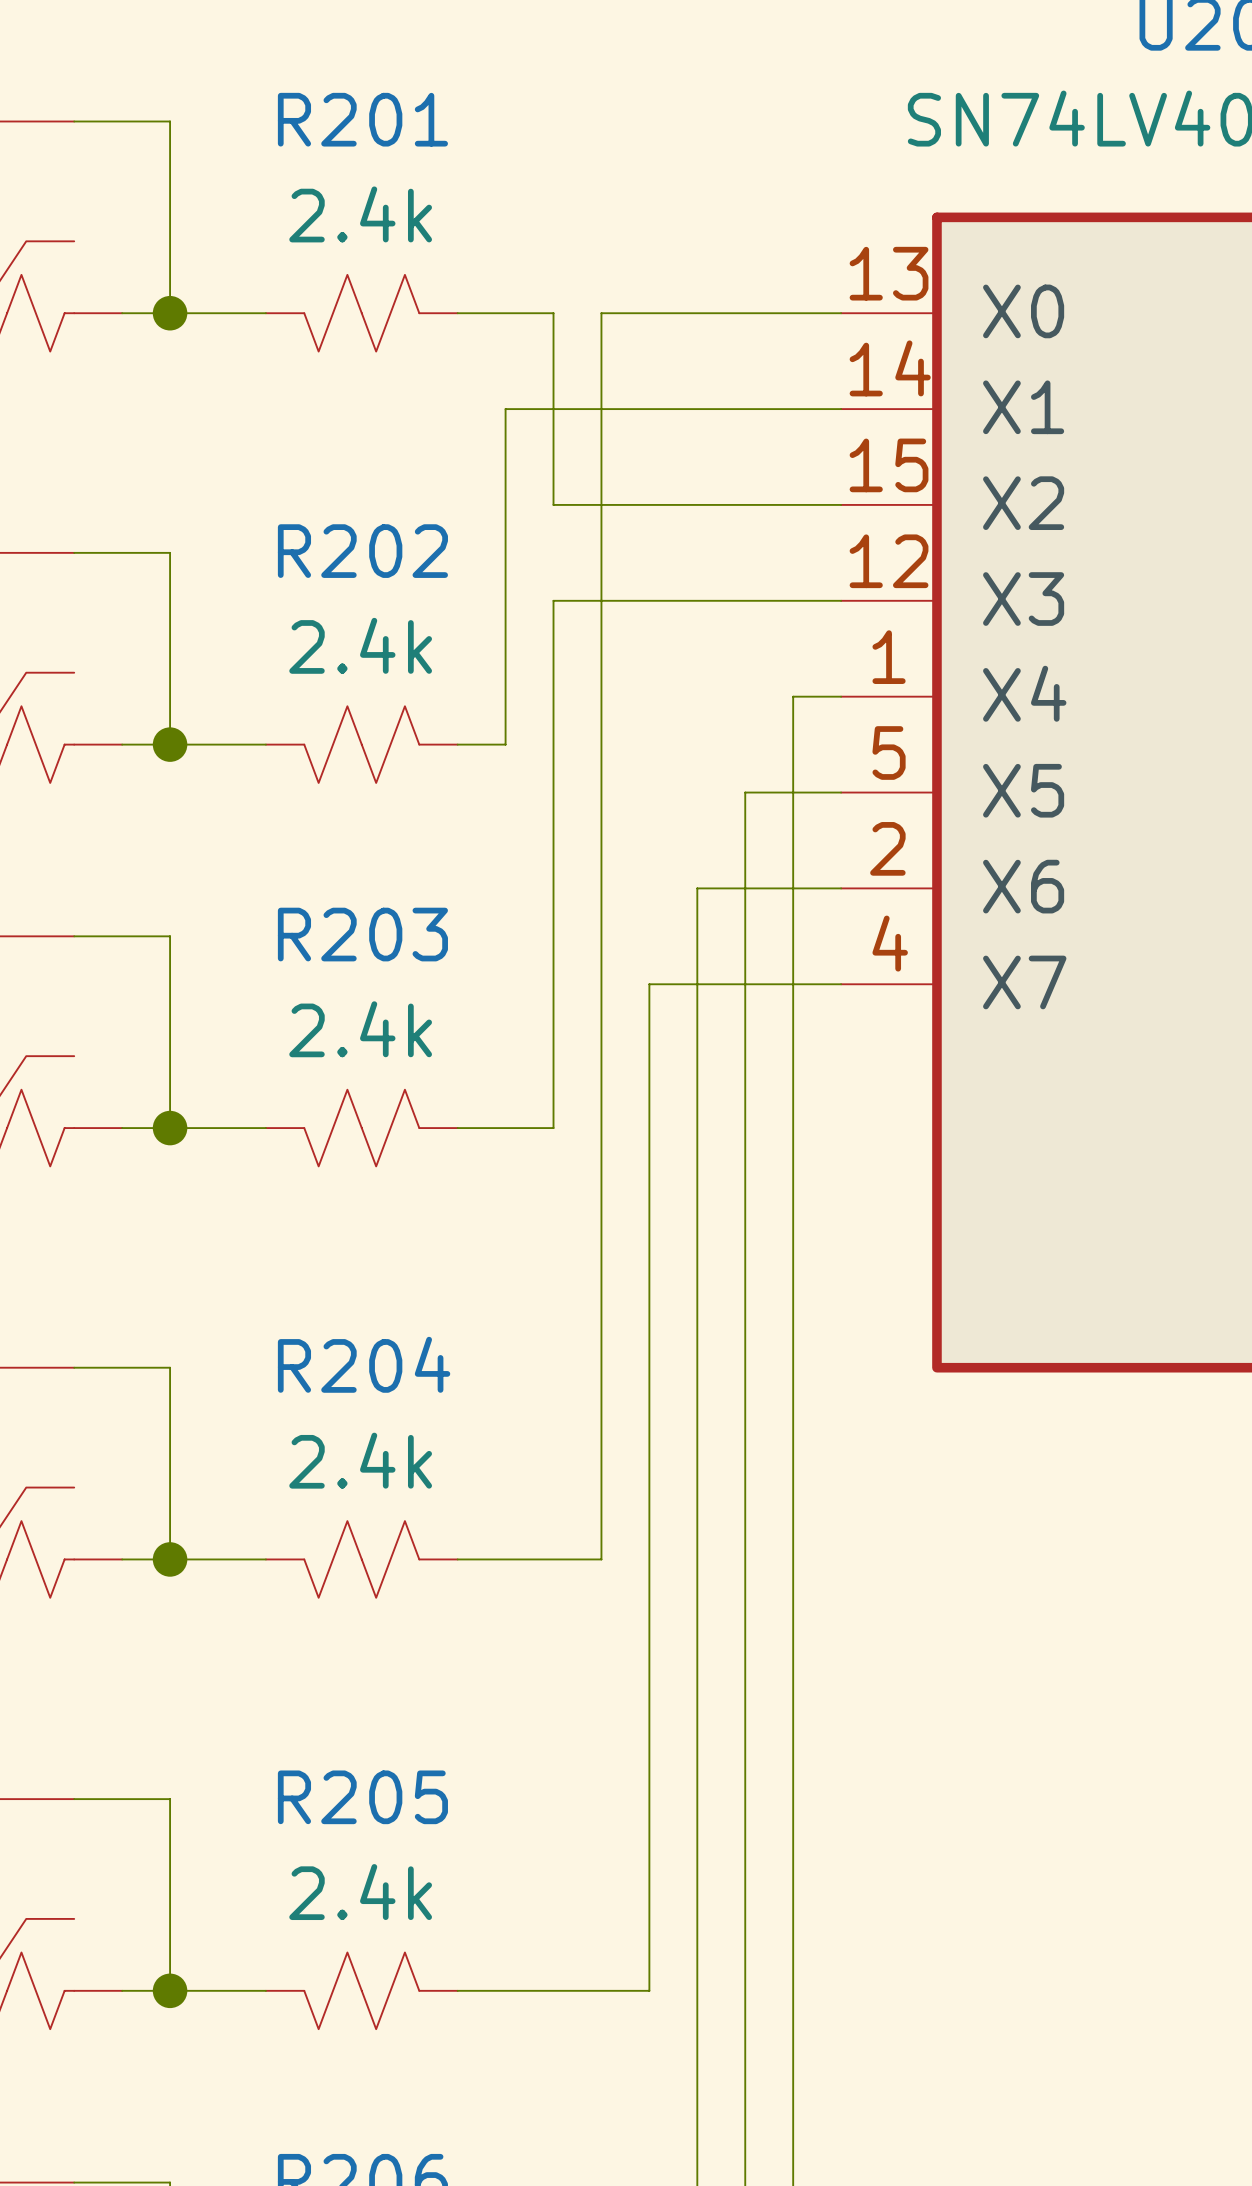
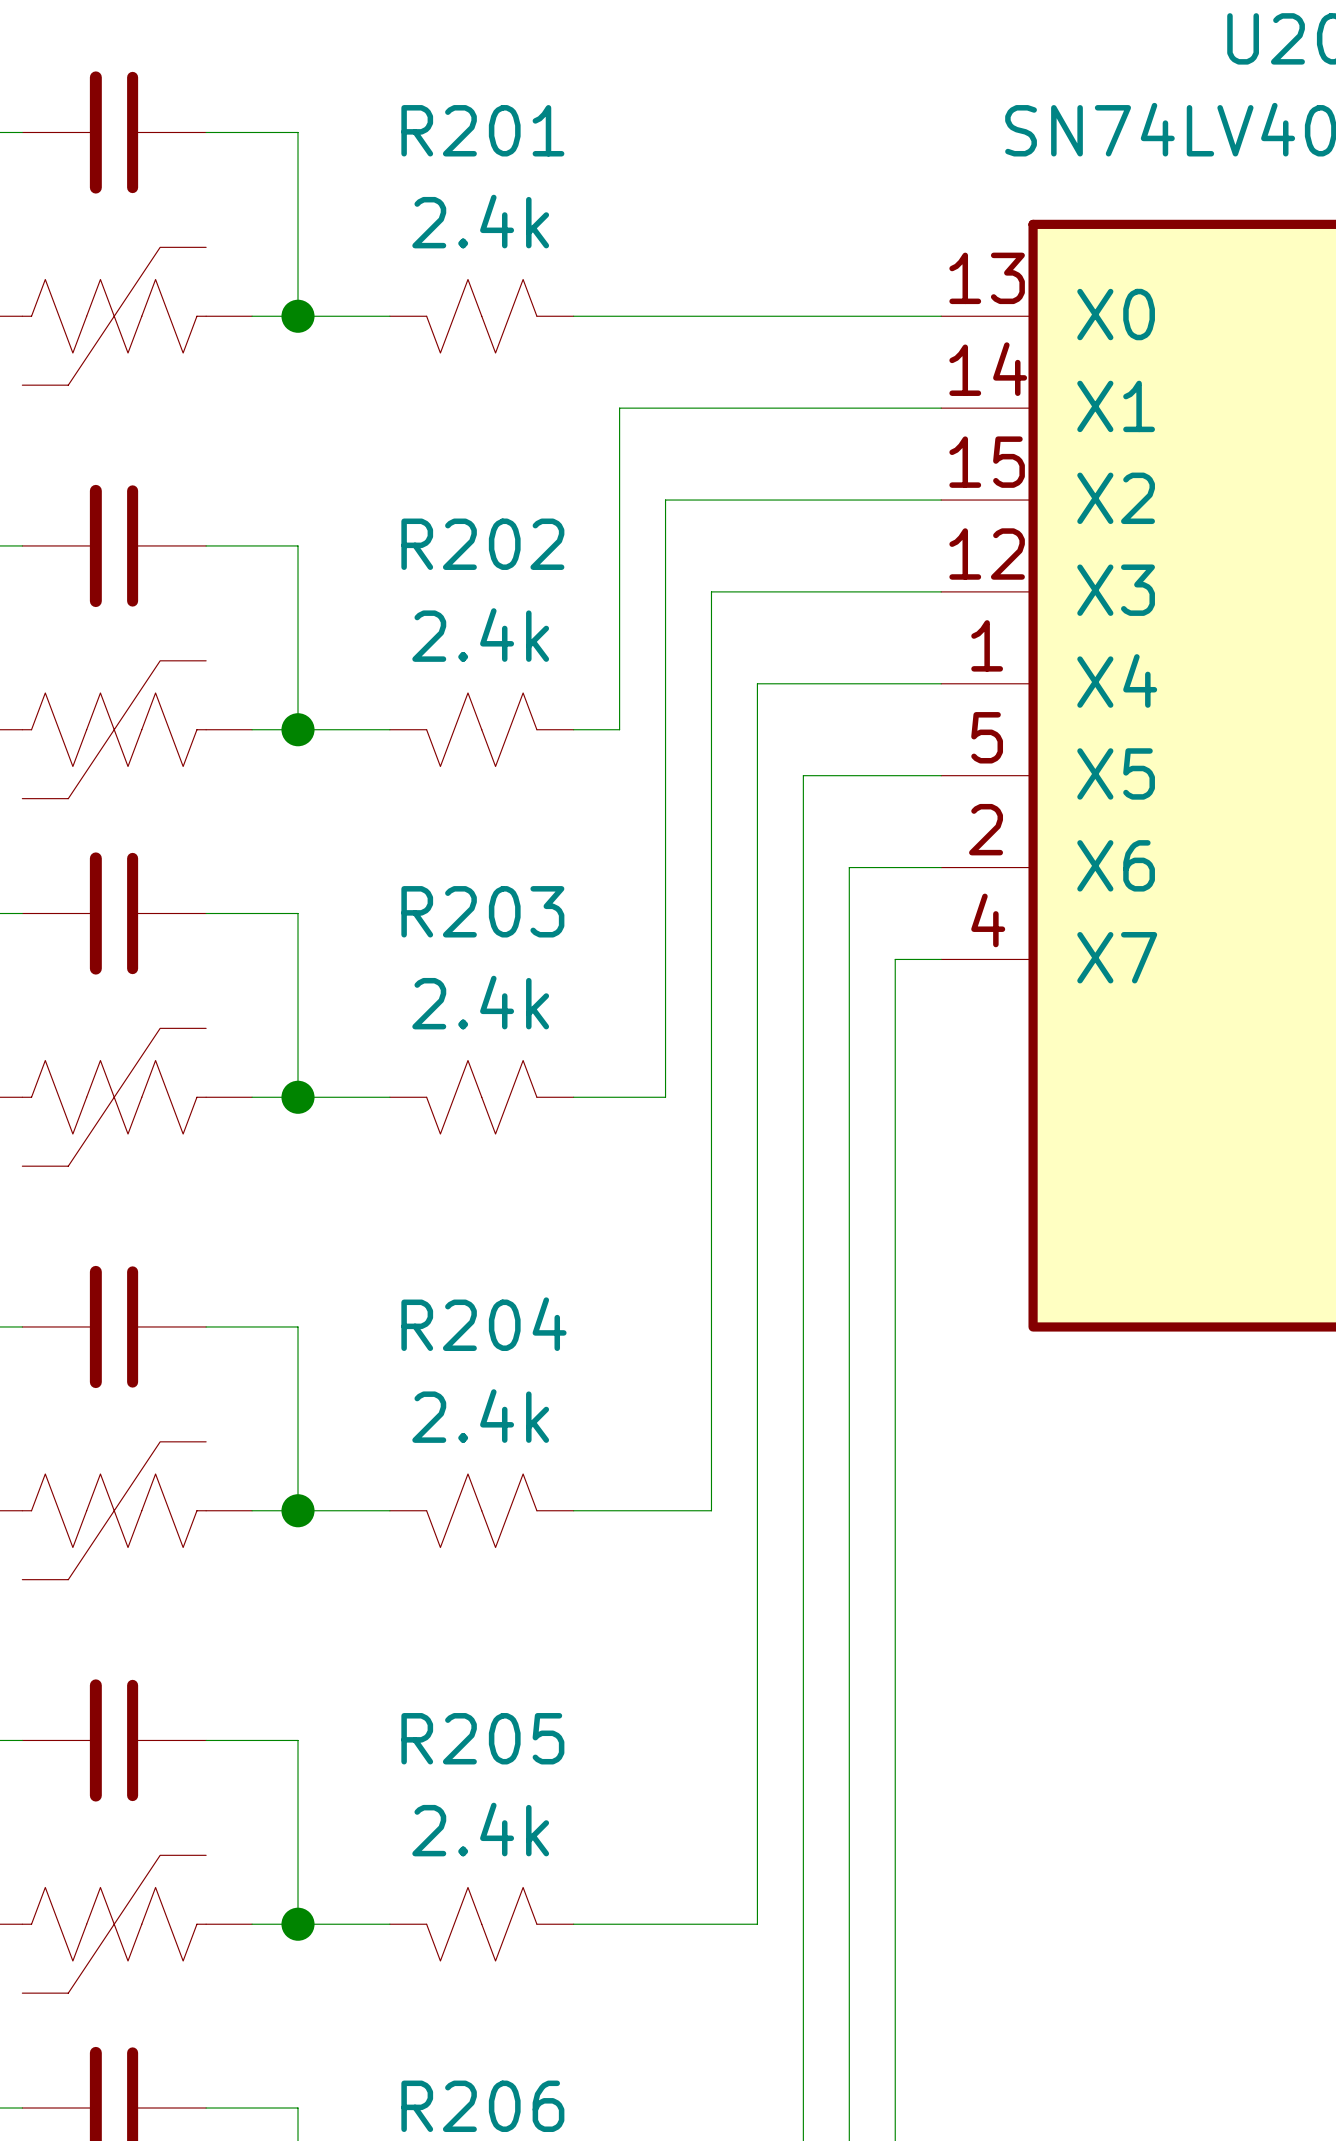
wire: (553, 313) (553, 504) -> (665, 316) (711, 316)
wire: (601, 313) (601, 600) (553, 600) -> (665, 500) (665, 591)
wire: (793, 696) (793, 984) (649, 984) -> (895, 683) (757, 683) (757, 959)
wire: (745, 792) (745, 888) (697, 888) -> (849, 775) (803, 775) (803, 867)

